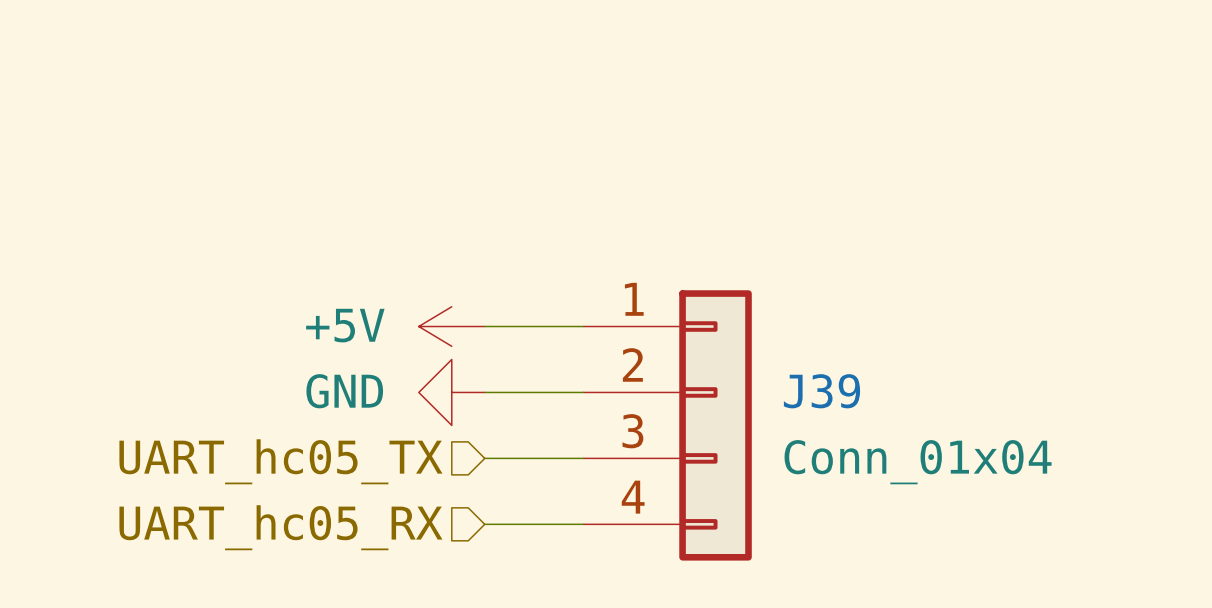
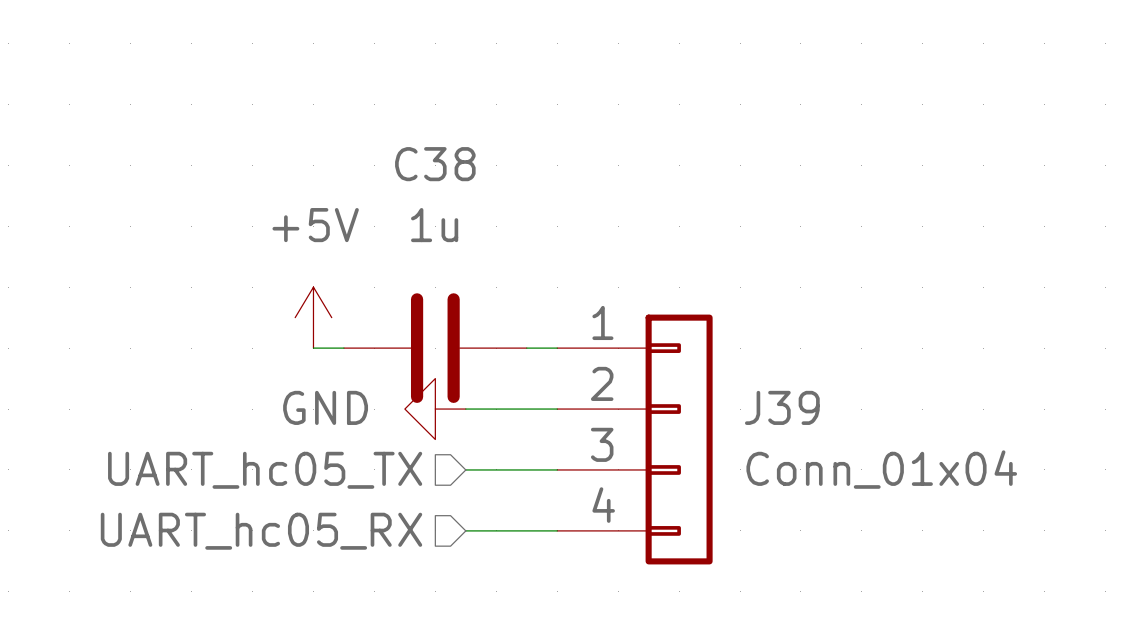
wire: none -> (313, 348) (343, 348)
power symbol rotation: 0° (451, 326) -> 90° clockwise (313, 317)
power symbol position: +5V (451, 326) -> +5V (313, 317)
C38: none -> 1u (435, 348)

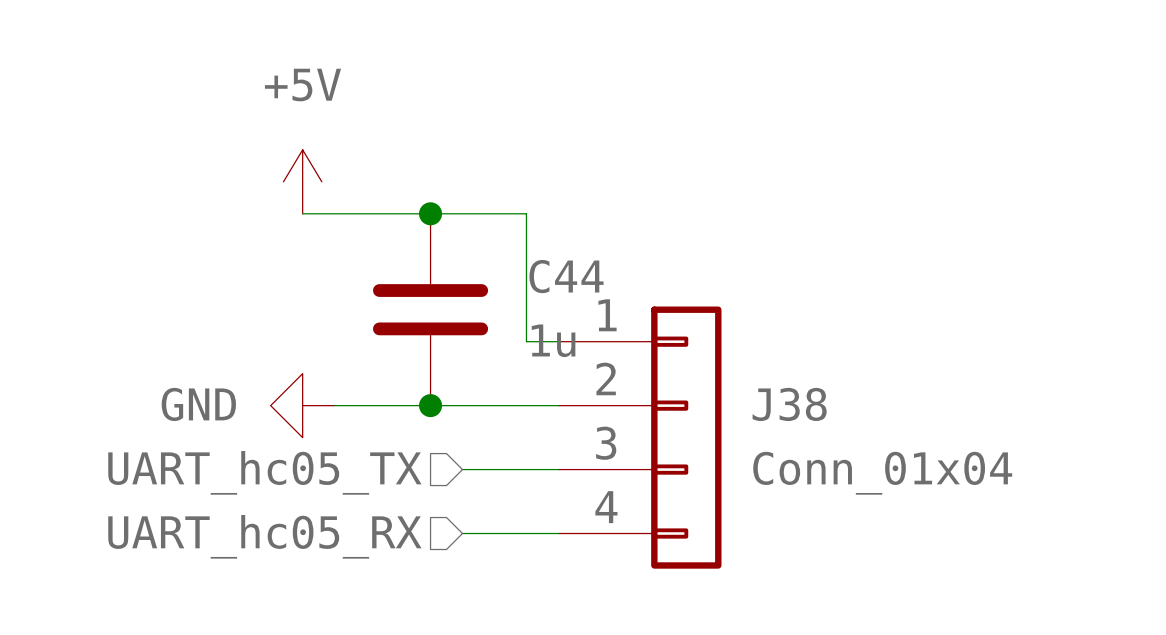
wire: none -> (302, 213) (526, 213) (526, 341)
junction: none -> (430, 213)
power symbol position: +5V (313, 317) -> +5V (302, 181)
C44: none -> 1u (430, 309)
wire: (313, 348) (343, 348) -> none
C38: 1u (435, 348) -> none
J39 name: J39 (782, 407) -> J38 (789, 404)
wire: none -> (334, 405) (462, 405)
power symbol position: GND (435, 409) -> GND (302, 405)
junction: none -> (430, 405)

